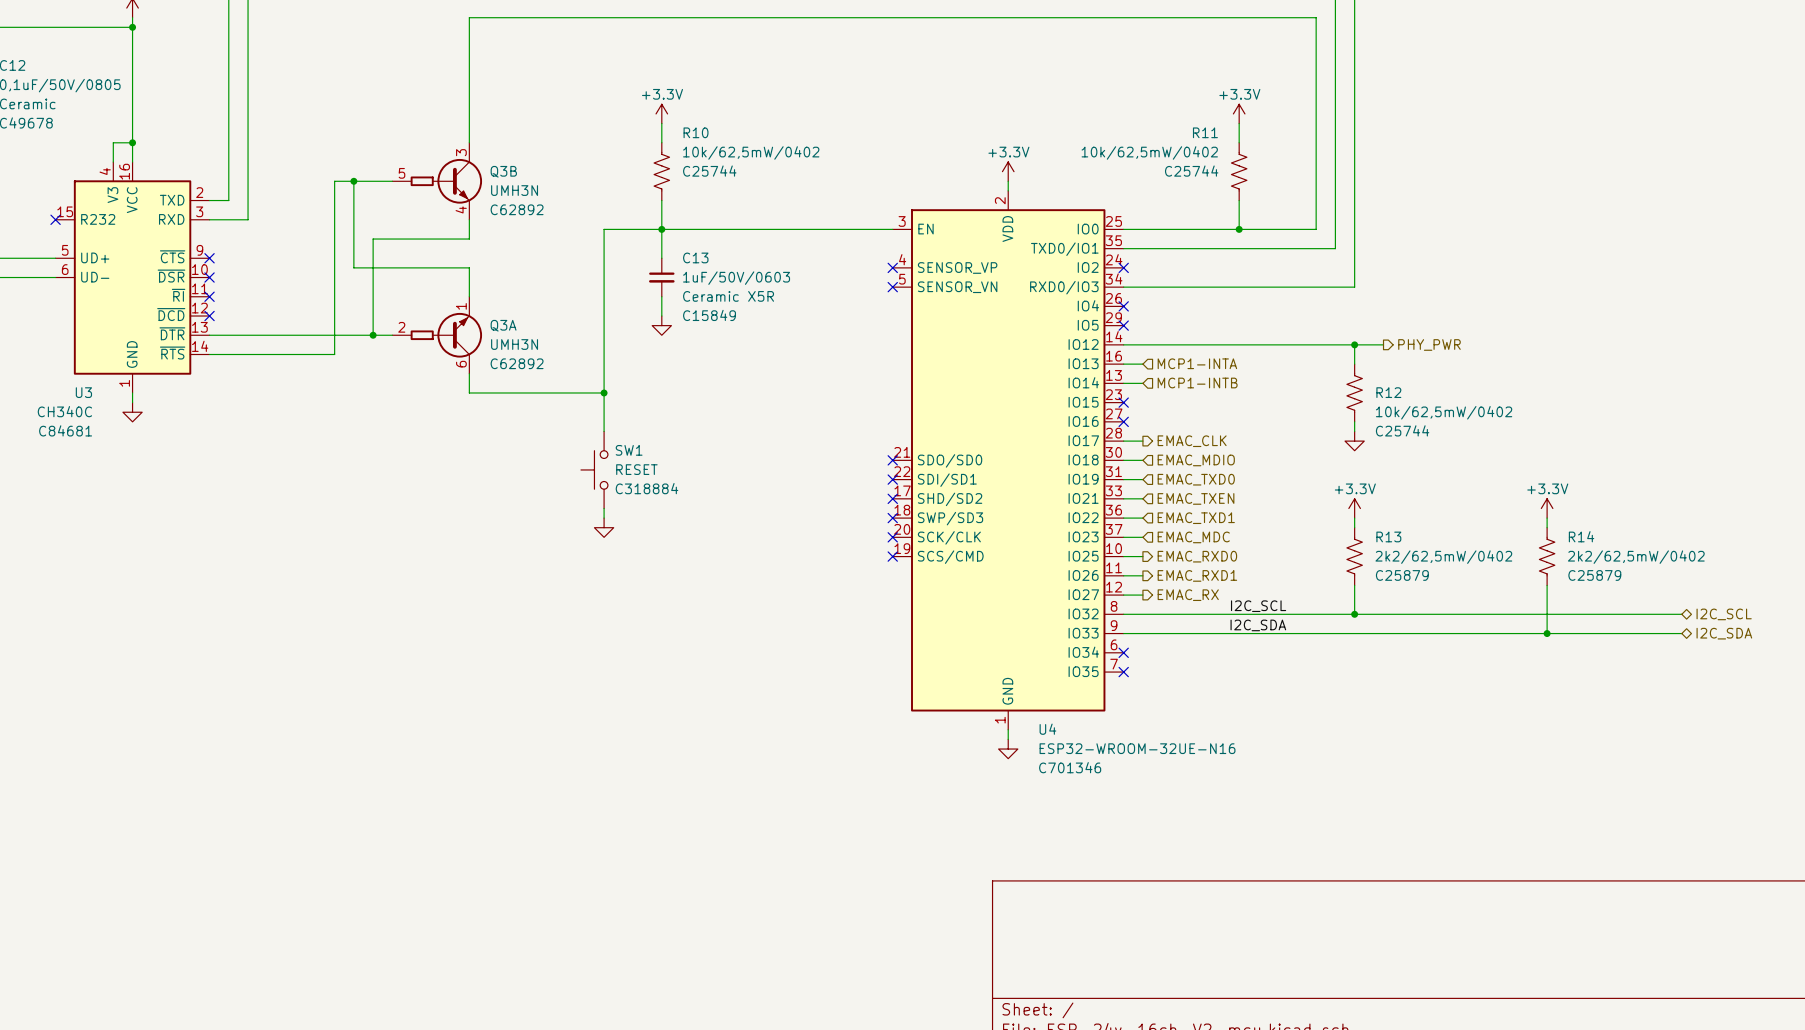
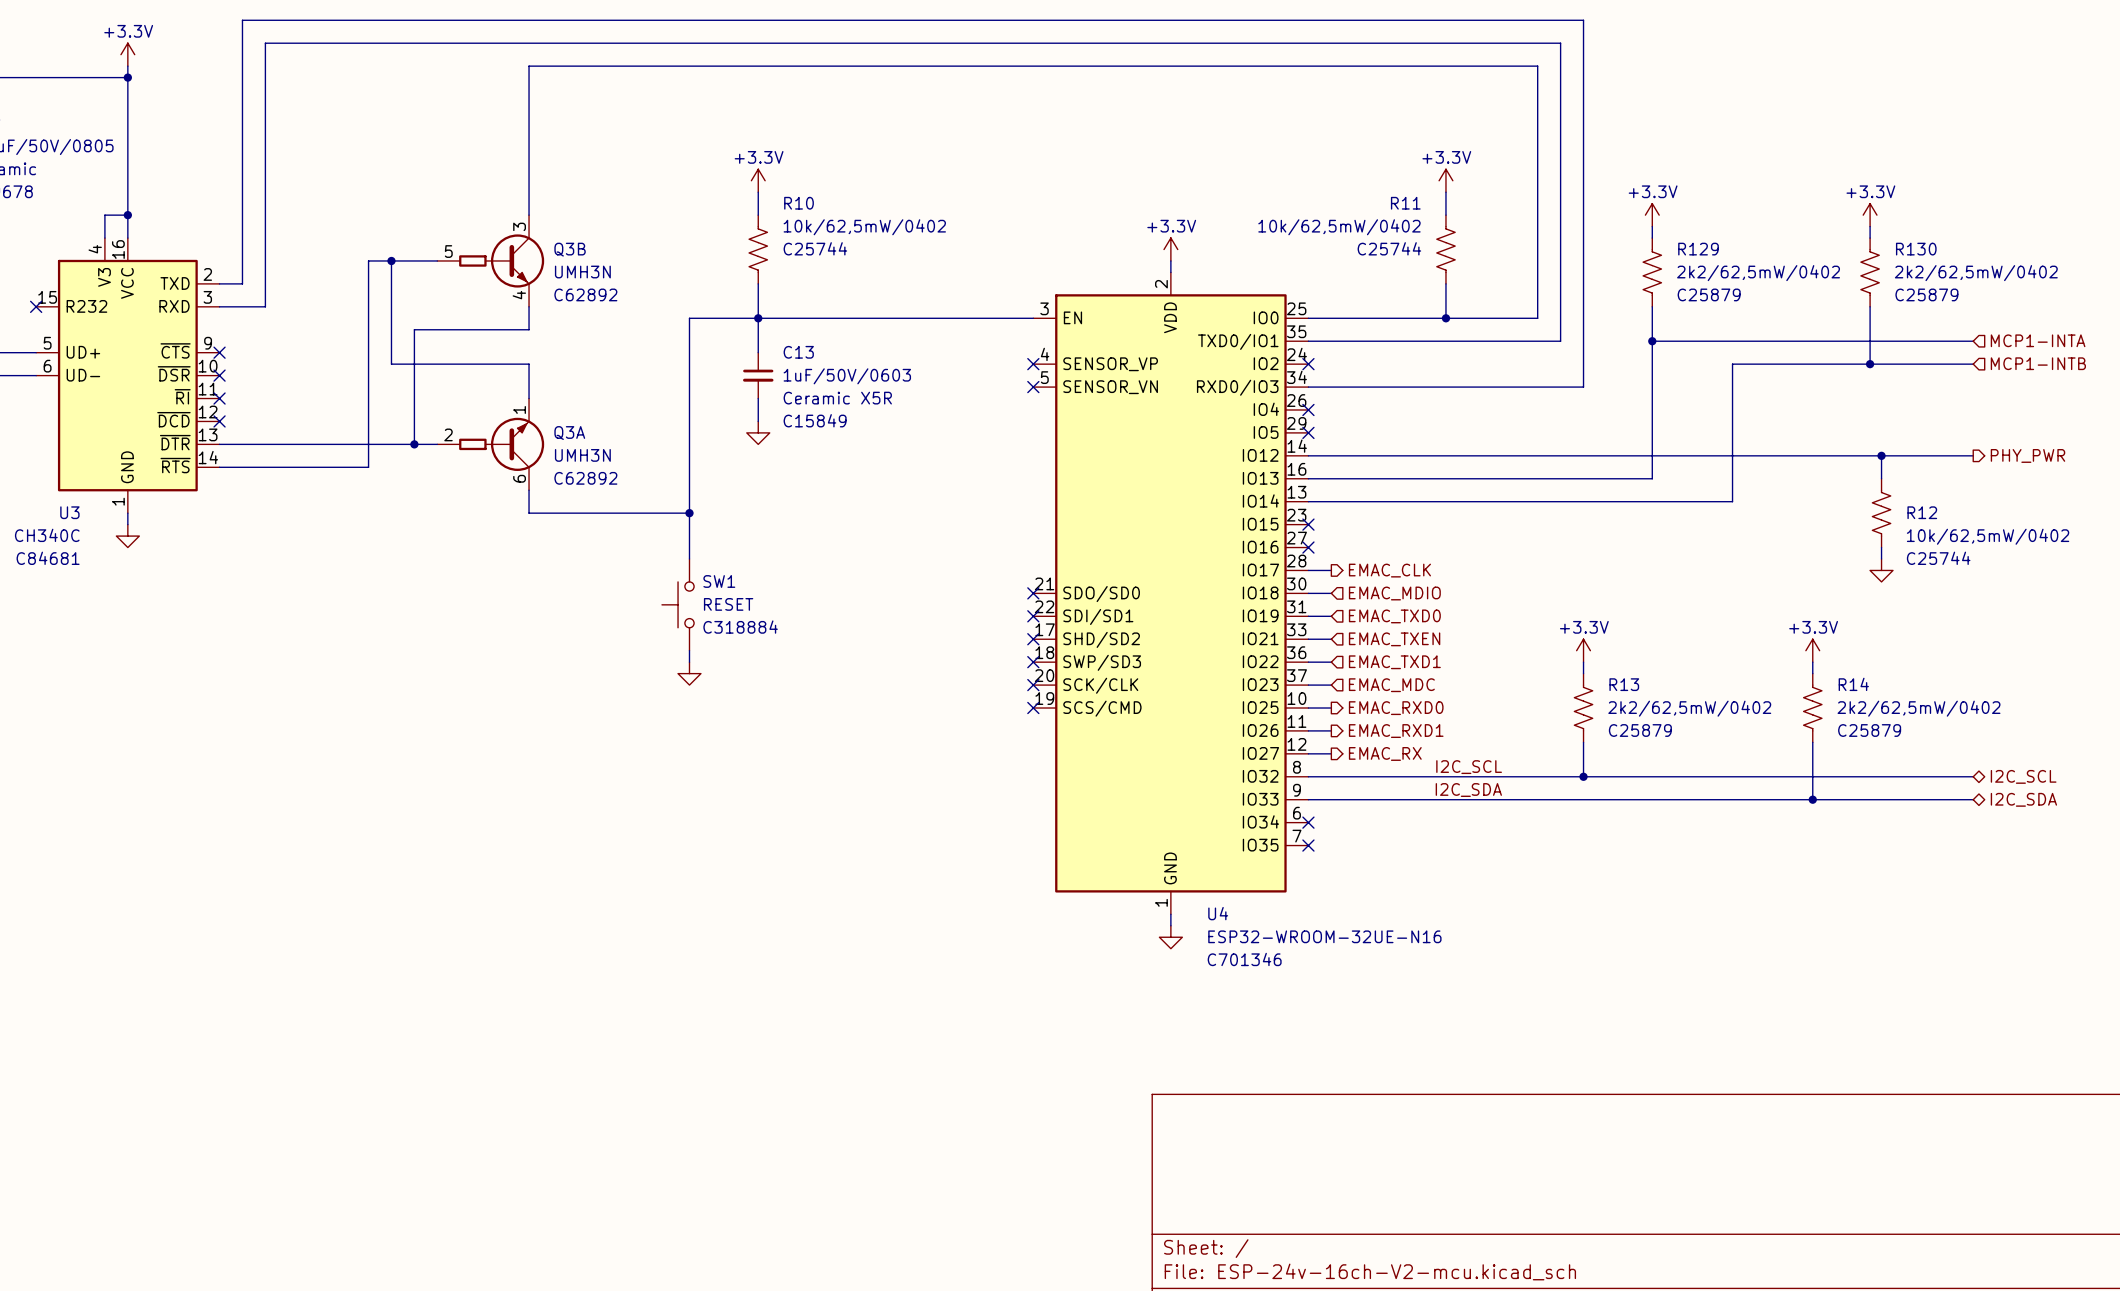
power symbol: none -> +3.3V (1652, 215)
power symbol: none -> +3.3V (1870, 215)
wire: none -> (1652, 226) (1652, 238)
wire: none -> (1870, 226) (1870, 238)
R129: none -> 2k2/62,5mW/0402 (1652, 272)
R130: none -> 2k2/62,5mW/0402 (1870, 272)
wire: none -> (1652, 306) (1652, 478) (1331, 478)
wire: none -> (1870, 306) (1870, 364)
wire: none -> (1652, 341) (1973, 341)
junction: none -> (1652, 341)
hierarchical label: none -> MCP1-INTA (2038, 340)
junction: none -> (1870, 364)
wire: none -> (1973, 364) (1732, 364) (1732, 501) (1331, 501)
hierarchical label: none -> MCP1-INTB (2038, 363)
wire: (1354, 344) (1354, 364) -> none
junction: (1354, 344) -> none
wire: none -> (1617, 455) (1973, 455)
hierarchical label: PHY_PWR (1429, 344) -> none
wire: none -> (1881, 455) (1881, 478)
junction: none -> (1881, 455)
hierarchical label: none -> PHY_PWR (2027, 455)
hierarchical label: MCP1-INTA (1197, 363) -> none
hierarchical label: MCP1-INTB (1197, 383) -> none
R12 position: (1354, 392) -> (1881, 513)
wire: (1354, 421) (1354, 431) -> none
wire: none -> (1881, 547) (1881, 559)
power symbol: (1354, 441) -> none
power symbol: none -> (1881, 570)

